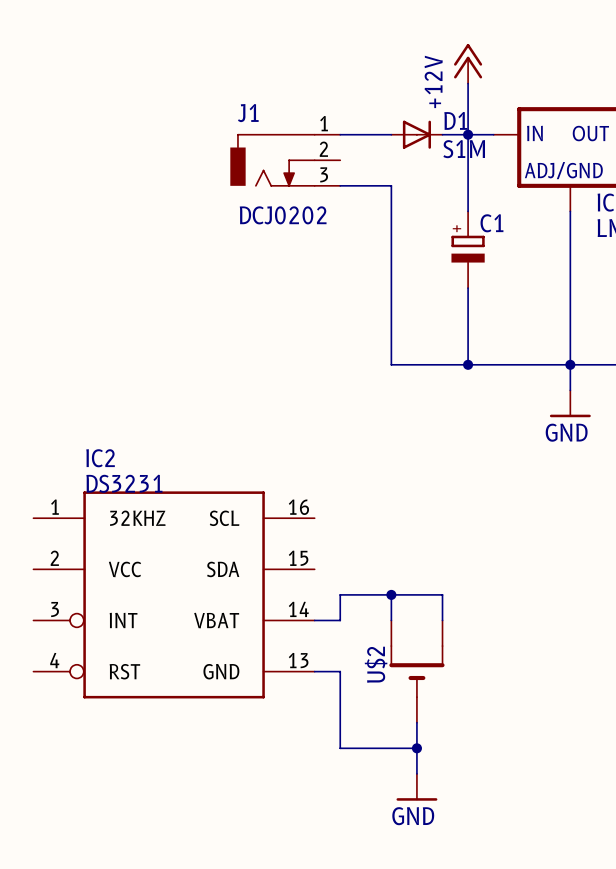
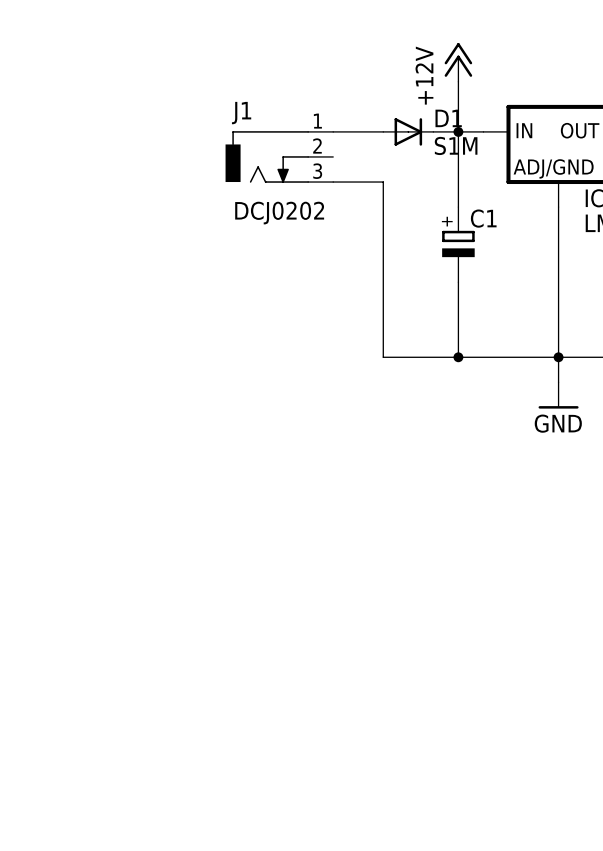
IC2: DS3231 (174, 594) -> none
wire: (391, 594) (391, 620) -> none
junction: (391, 594) -> none
wire: (314, 620) (340, 620) (340, 594) (442, 594) (442, 620) -> none
wire: (314, 671) (340, 671) (340, 748) (416, 748) -> none
U$2: (416, 671) -> none
wire: (416, 722) (416, 773) -> none
junction: (416, 748) -> none
power symbol: GND (416, 787) -> none

